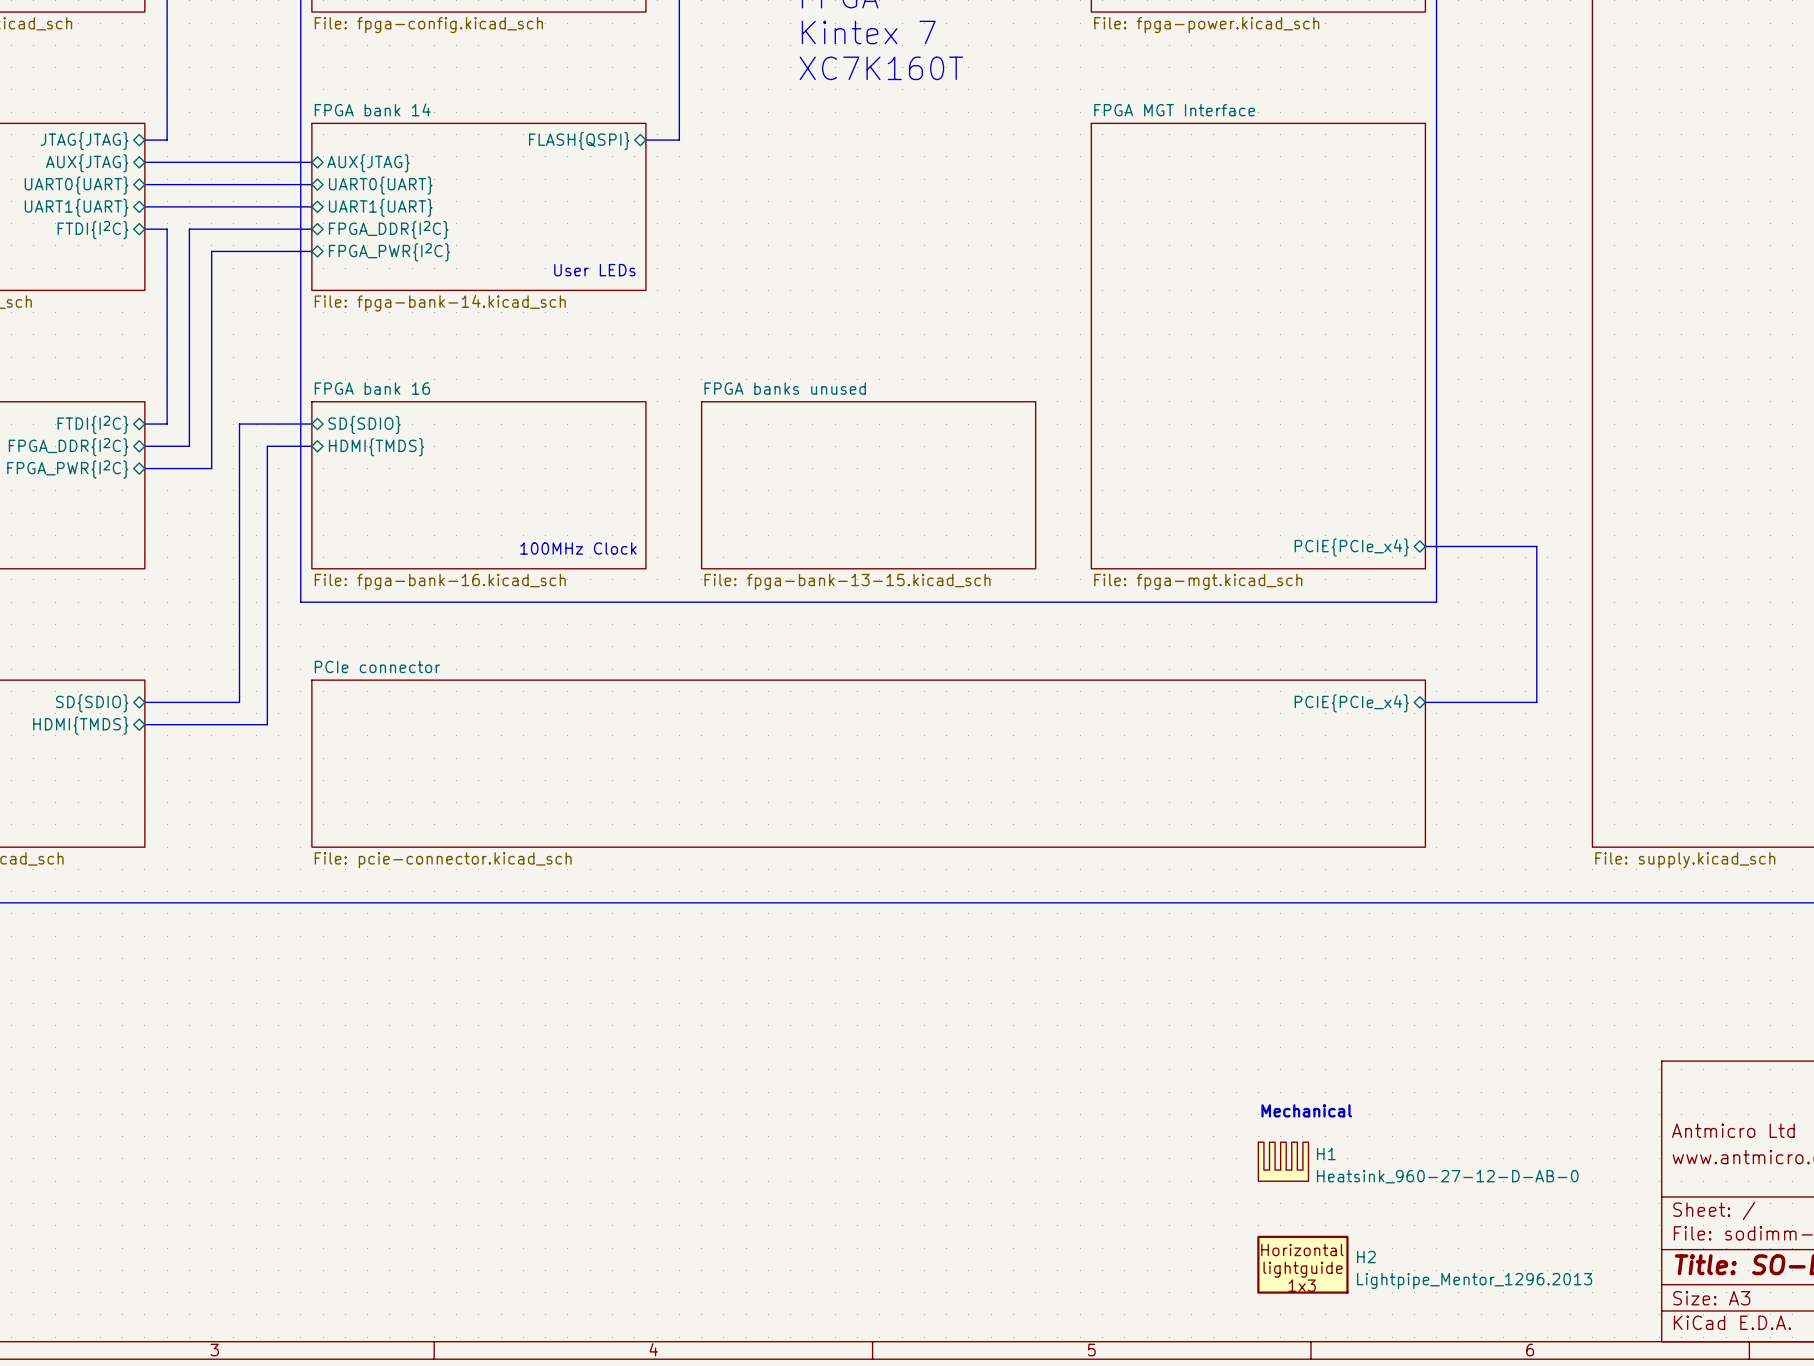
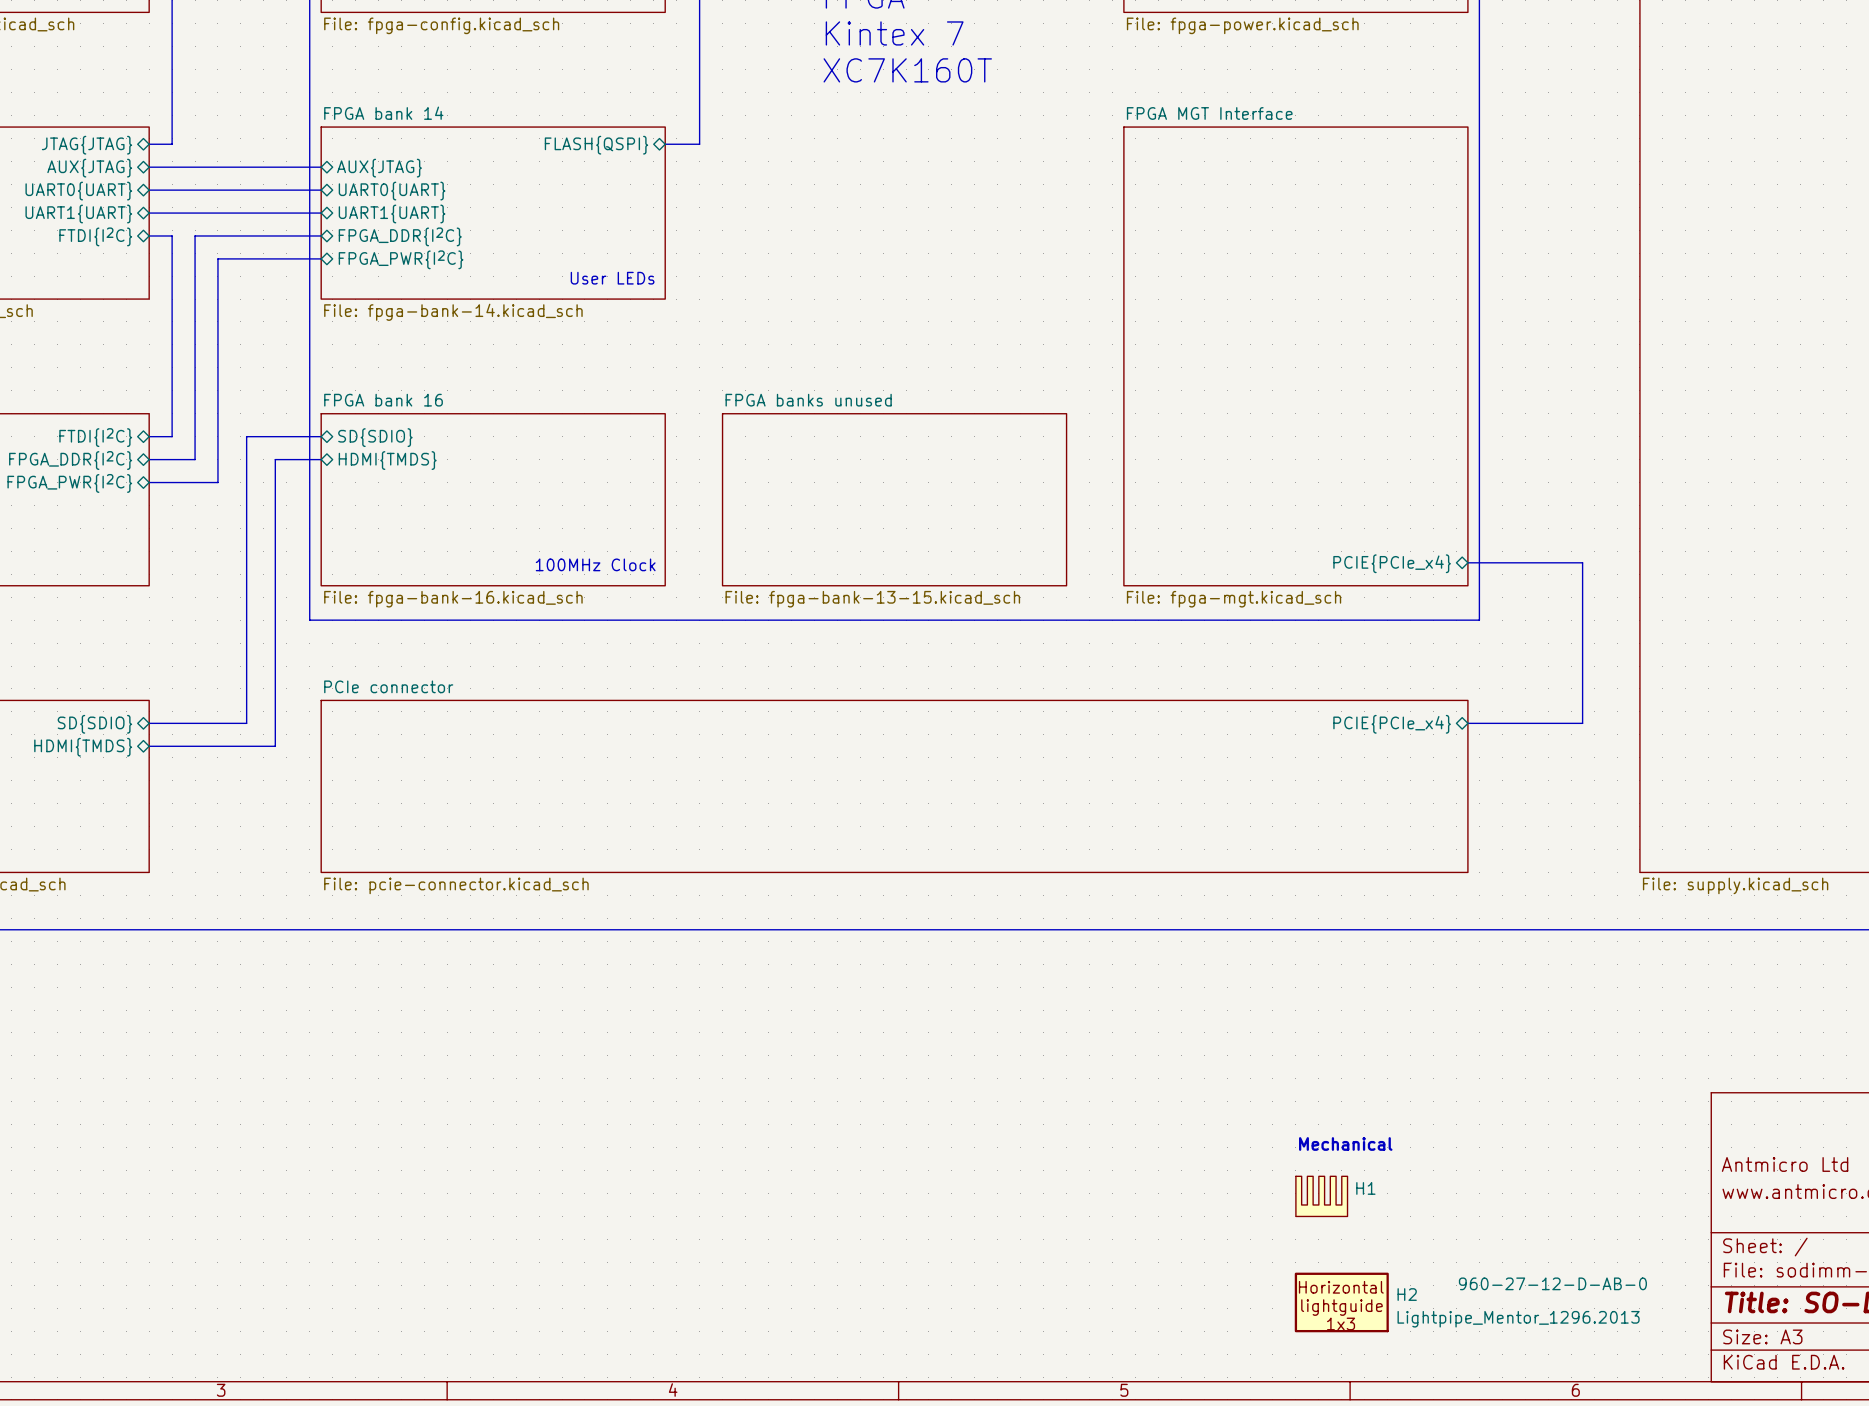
H1 value: Heatsink_960-27-12-D-AB-0 (1447, 1176) -> none
H1 text: none -> 960-27-12-D-AB-0 (1552, 1283)

